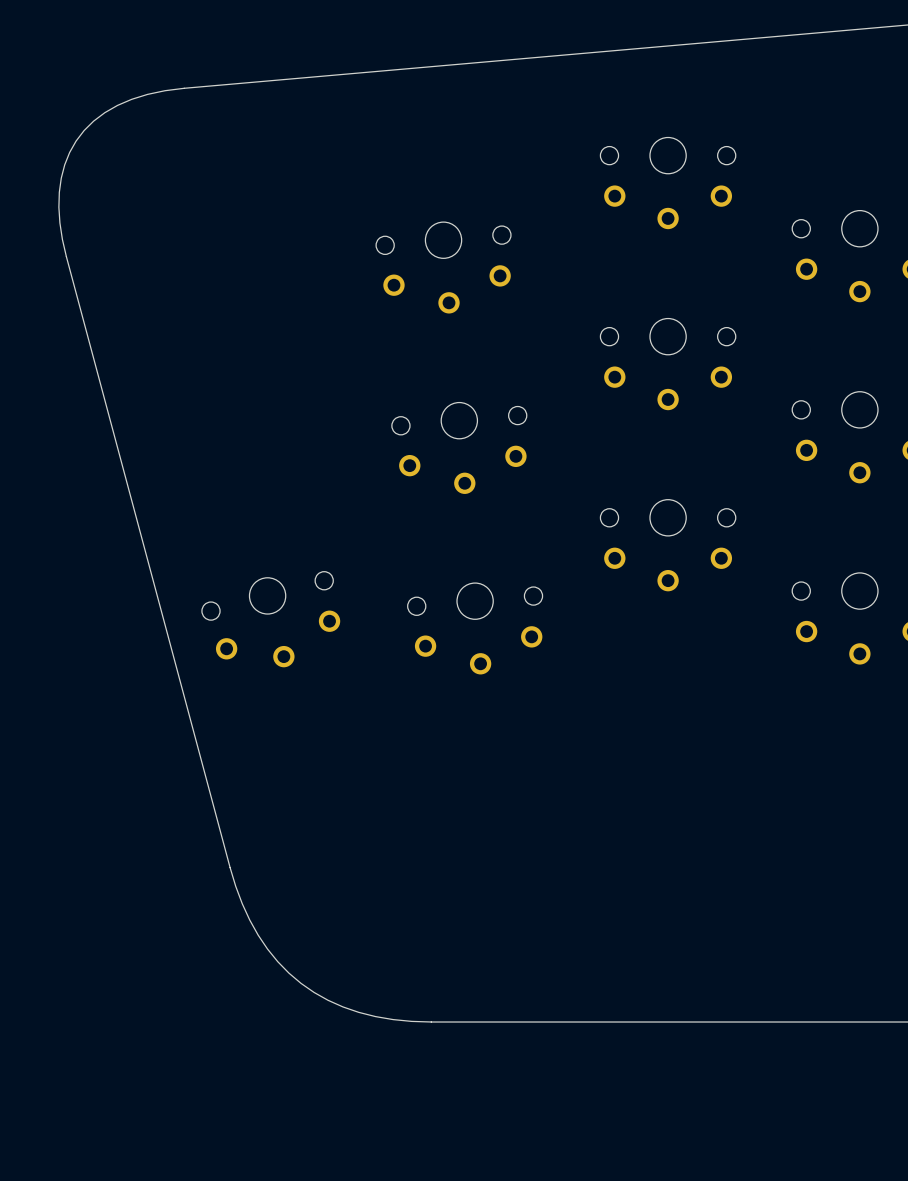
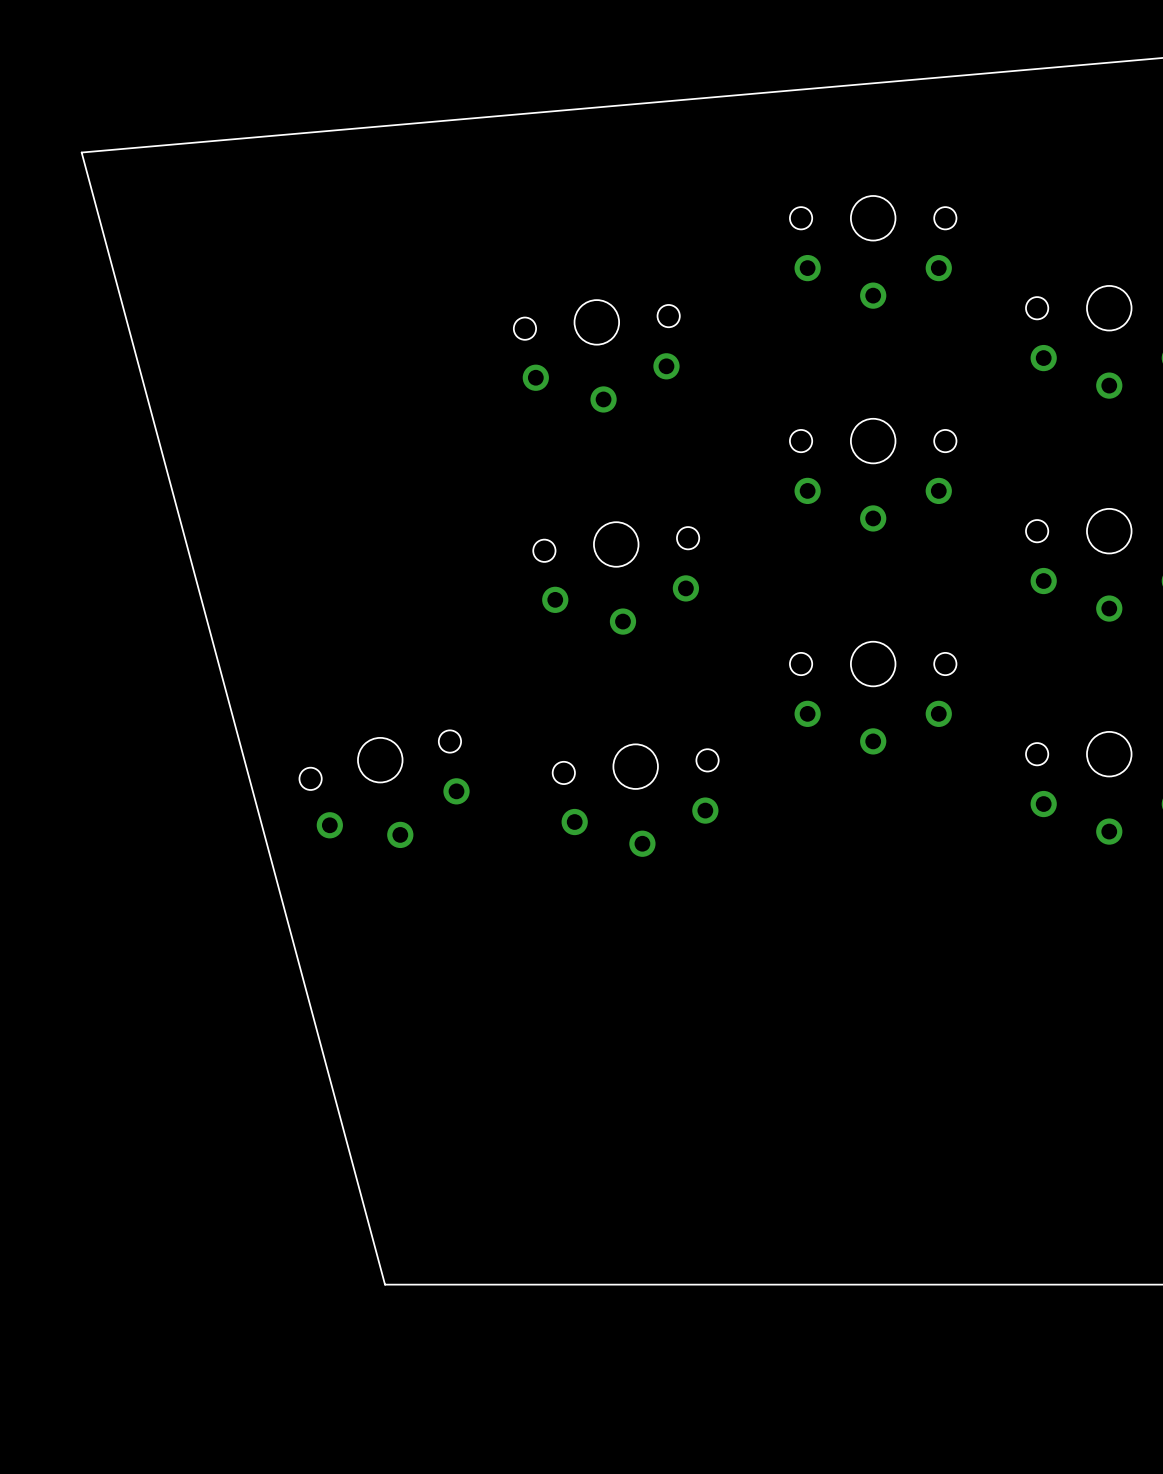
board edge: (184, 88) (147, 94) (117, 105) (93, 121) (76, 141) (64, 164) (59, 192) (59, 223) (66, 256) -> (277, 135) (81, 152) (132, 342)
board edge: (230, 867) (242, 903) (258, 935) (277, 961) (301, 983) (328, 1000) (358, 1012) (393, 1019) (431, 1022) -> (334, 1094) (385, 1284) (581, 1284)

